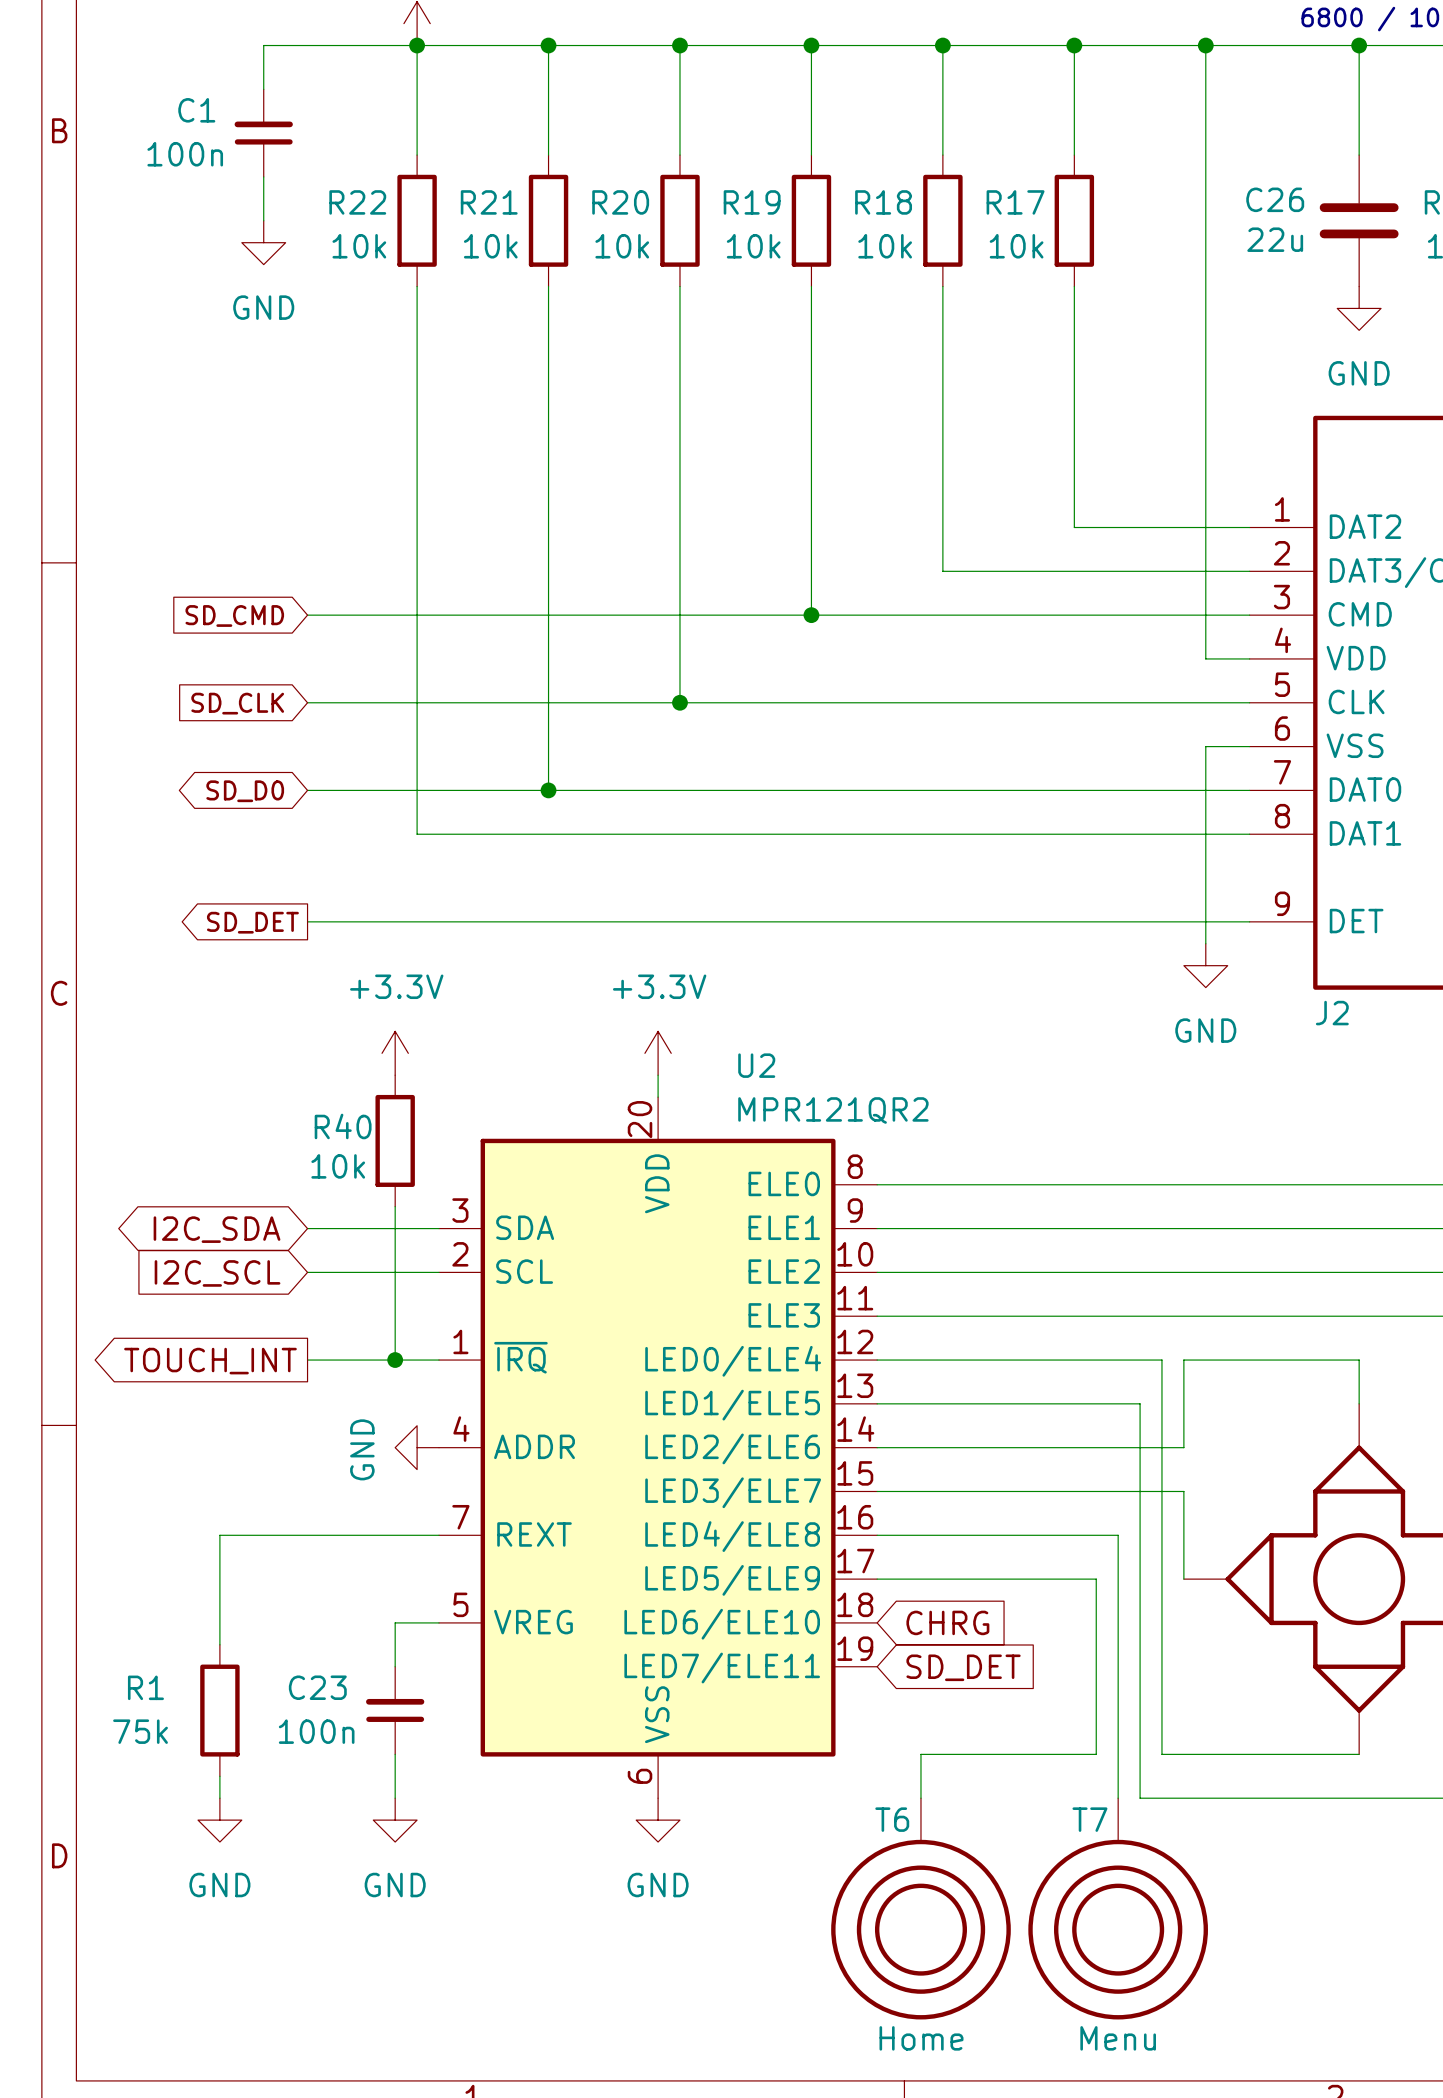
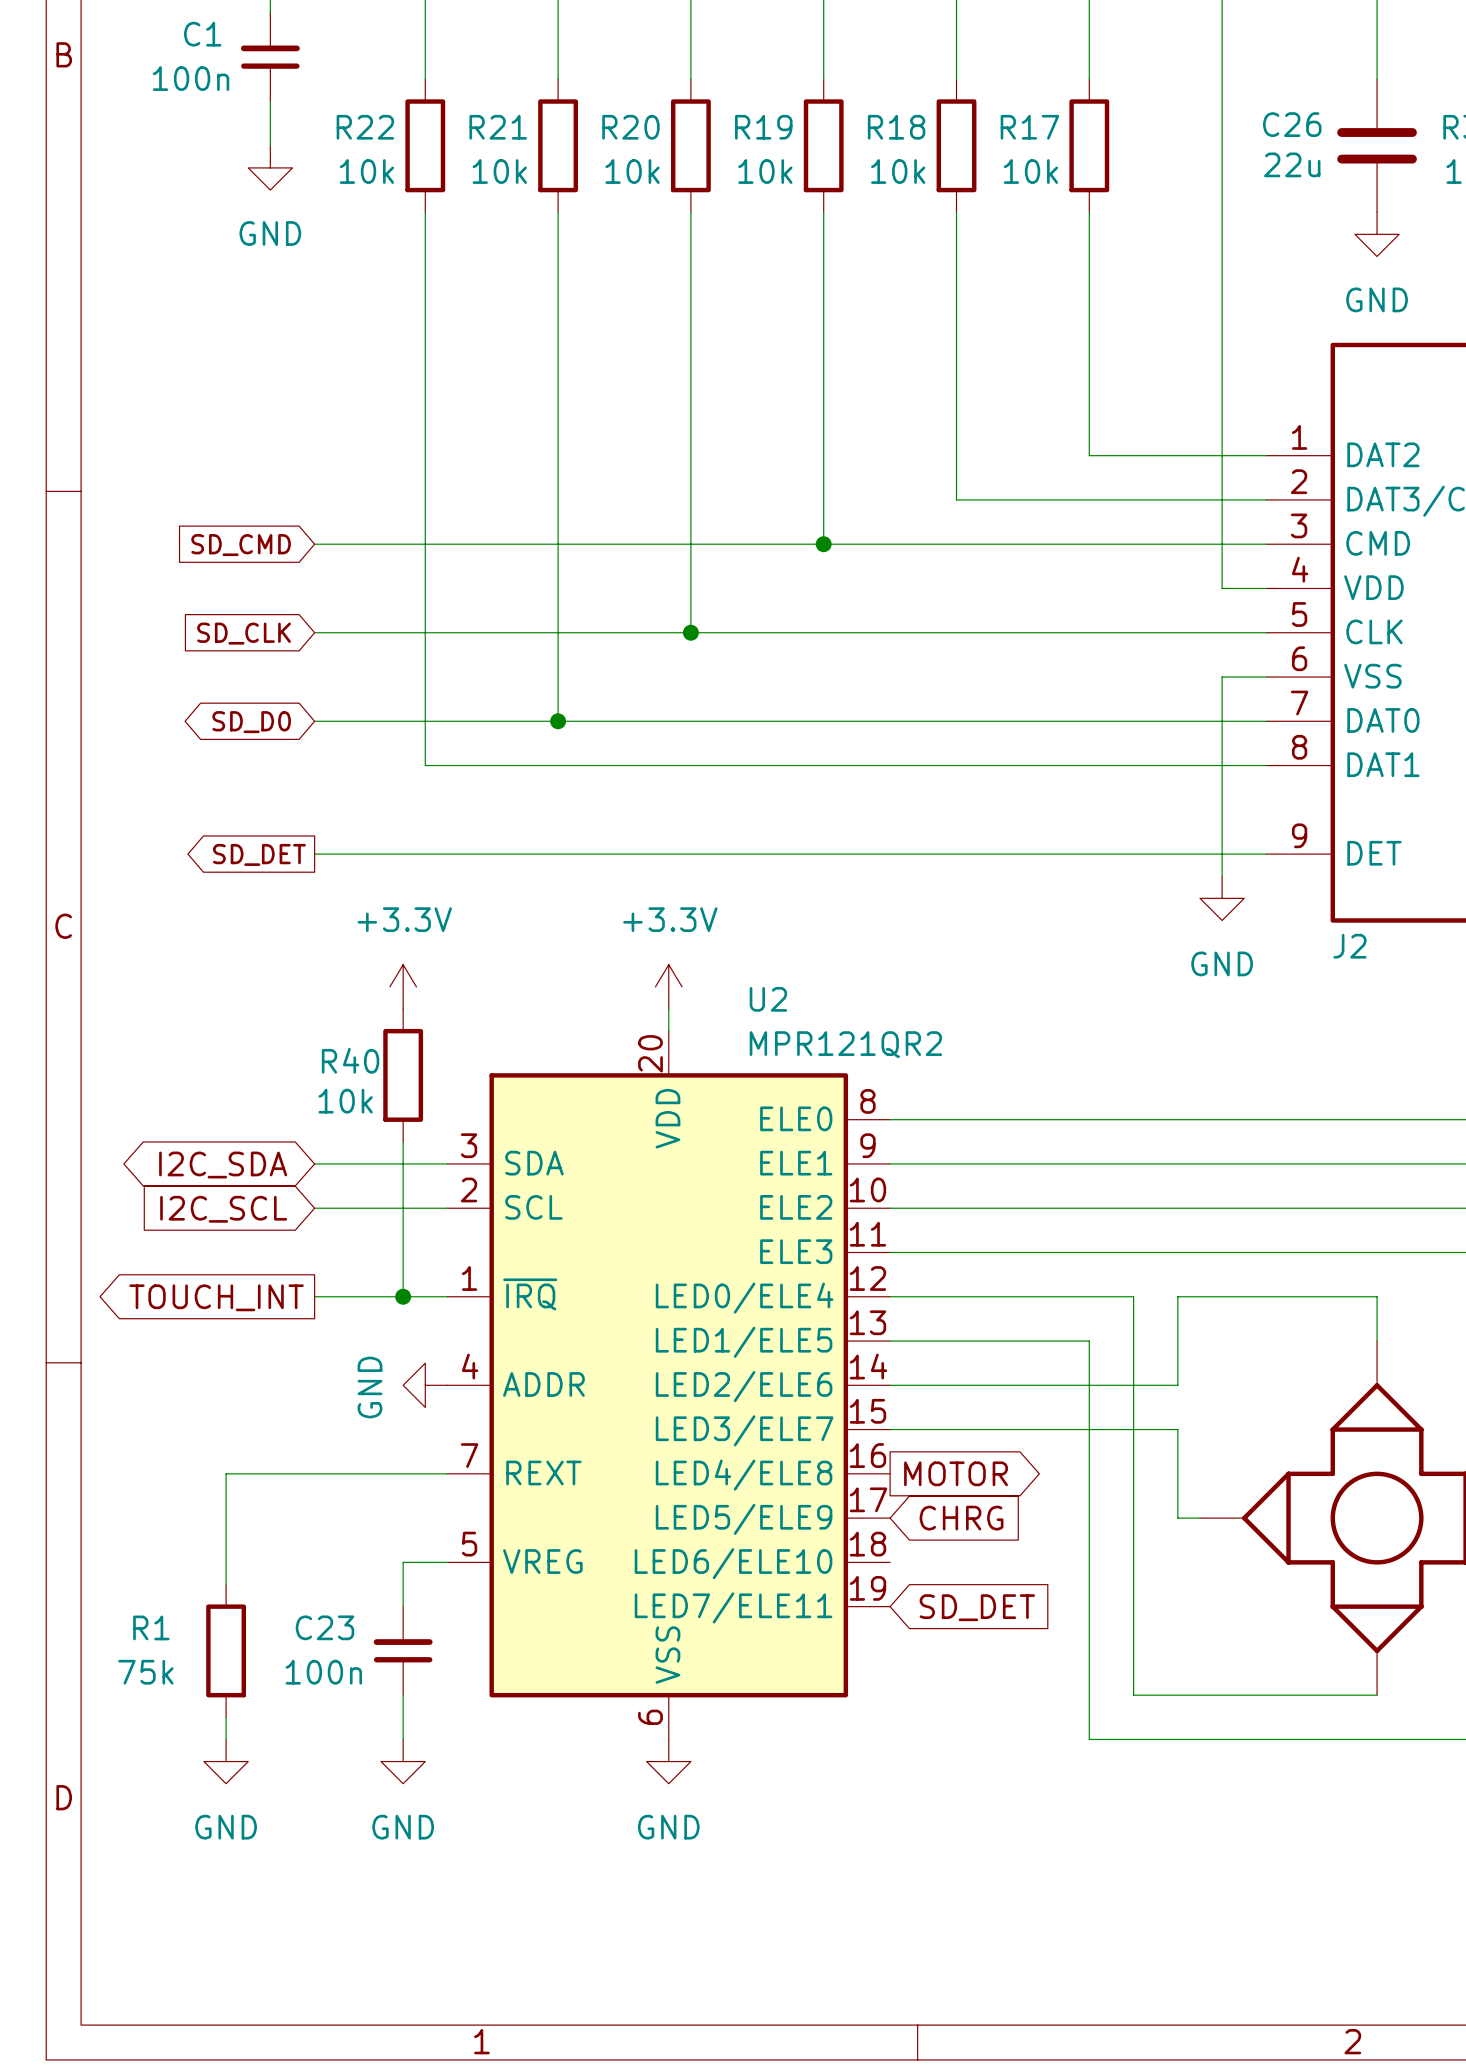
wire: (1118, 1360) (1161, 1360) -> (1199, 1296) (1177, 1296)
wire: (1183, 1360) (1183, 1447) (1161, 1447) (1161, 1491) (1183, 1491) (1183, 1579) -> none
wire: (1074, 1403) (1140, 1403) (1140, 1798) -> (1089, 1341) (1089, 1739) (1155, 1739)
wire: (877, 1535) (1118, 1535) -> (1133, 1296) (1133, 1473)
global label: none -> MOTOR (956, 1473)
wire: (877, 1579) (1096, 1579) (1096, 1754) (920, 1754) (920, 1798) -> none
wire: (1161, 1579) (1161, 1754) -> (1177, 1518) (1199, 1518)
global label position: CHRG (947, 1622) -> CHRG (961, 1518)
wire: (1118, 1754) (1118, 1798) -> (1133, 1695) (1177, 1695)
T6: Home (920, 1908) -> none
T7: Menu (1118, 1908) -> none

